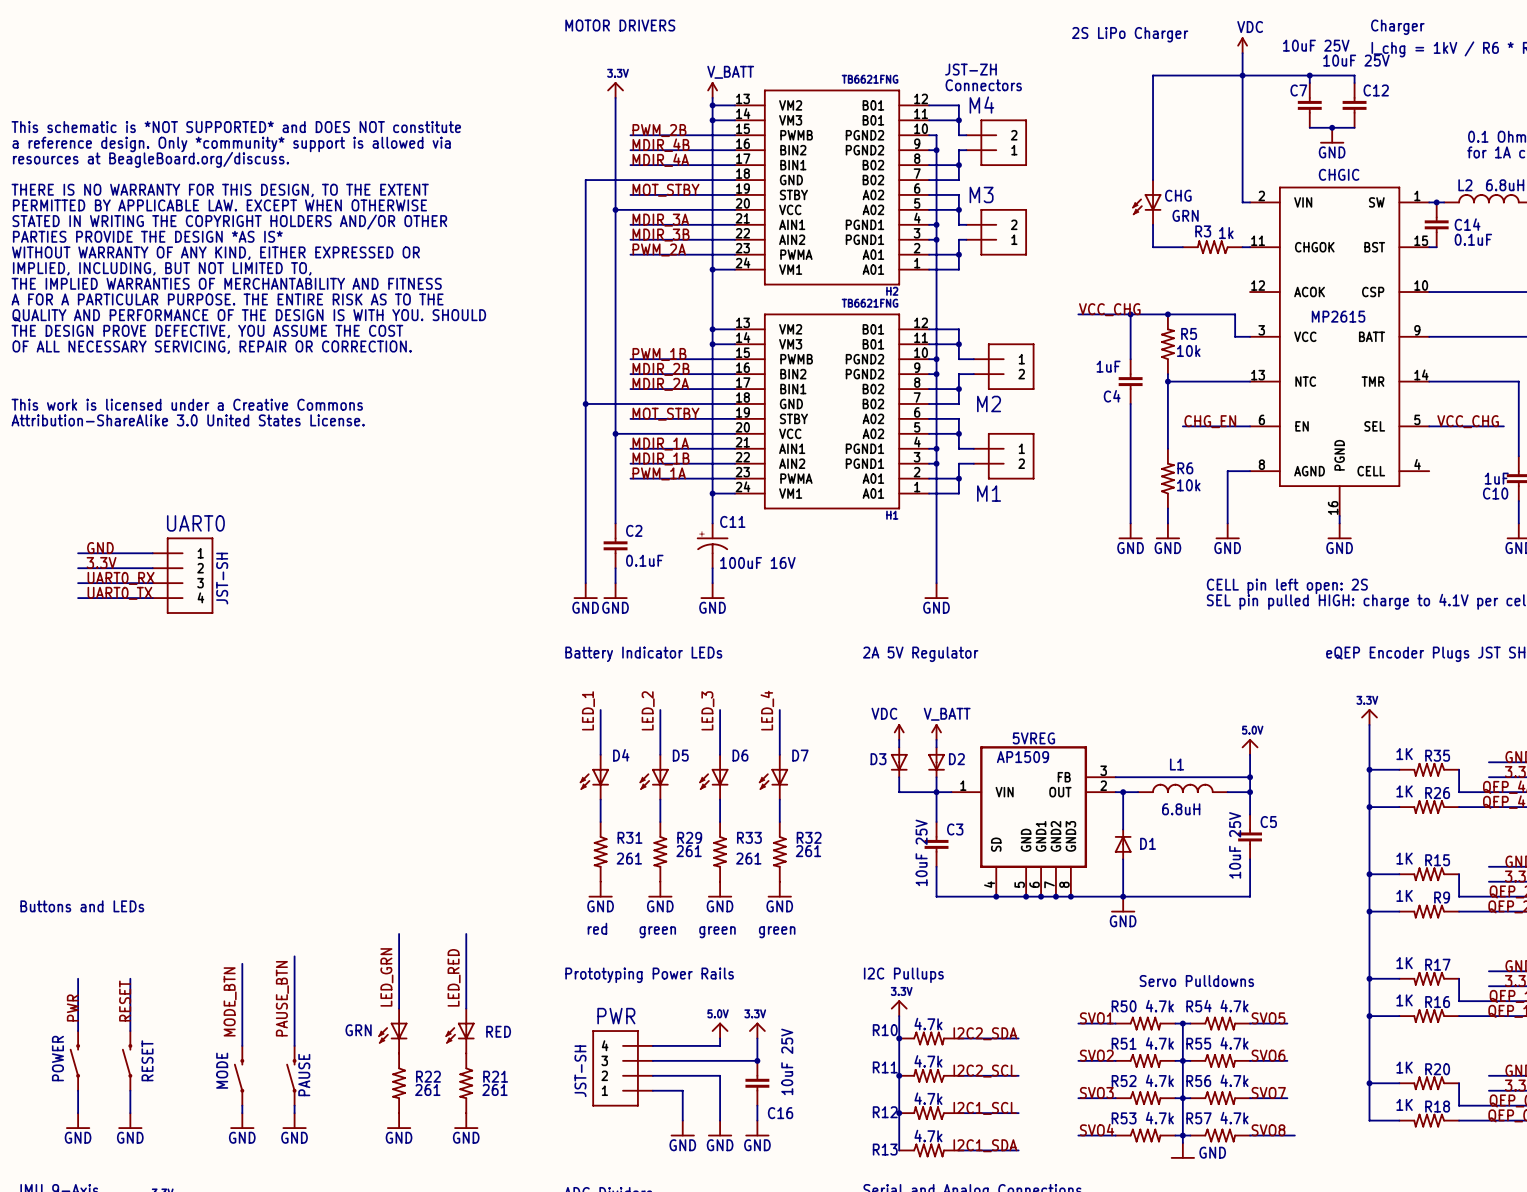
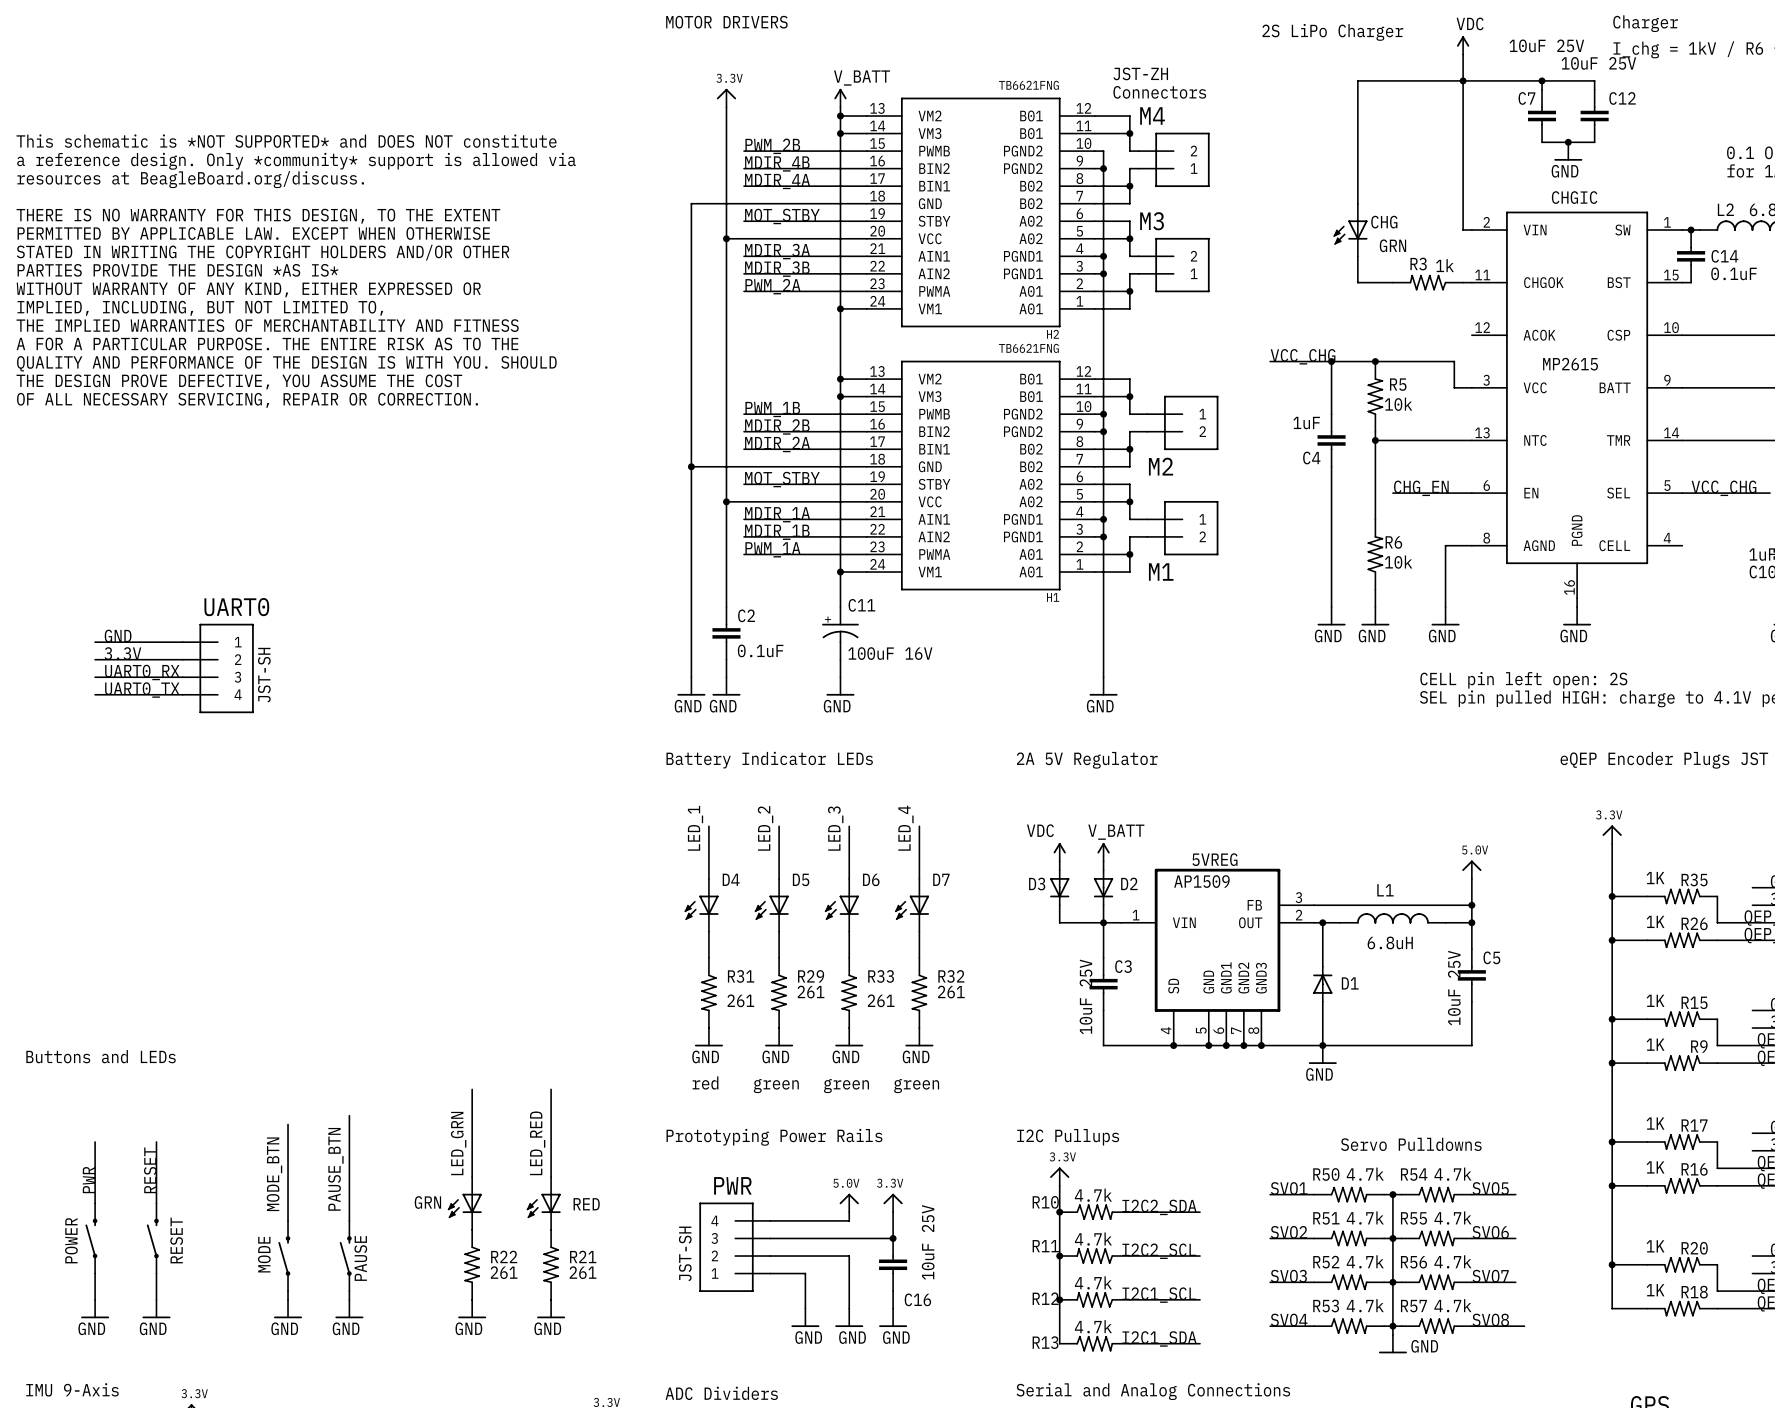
text: This work is licensed under a Creative Commons (187, 404) -> none
text: Attribution-ShareAlike 3.0 United States License. (188, 420) -> none

